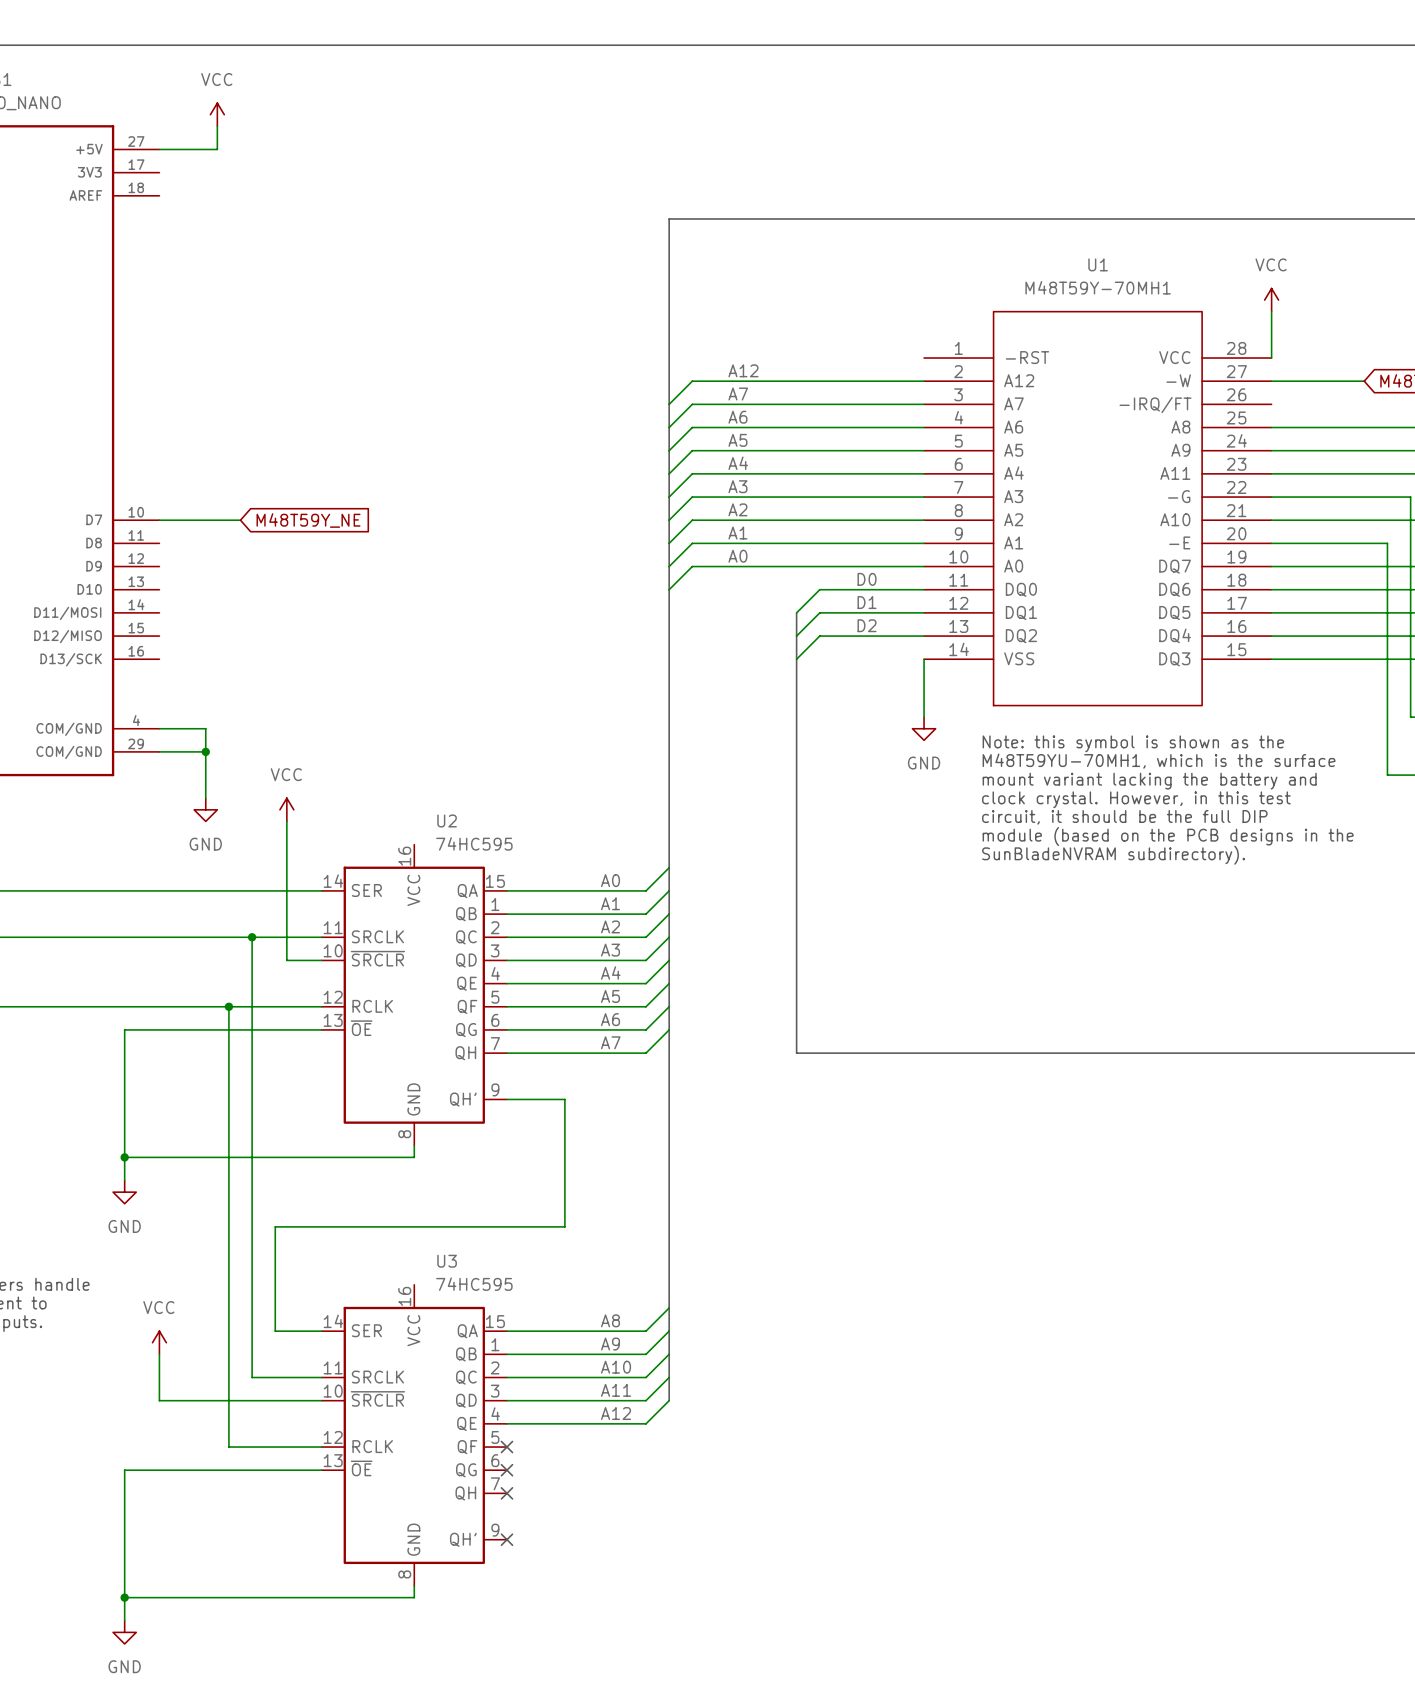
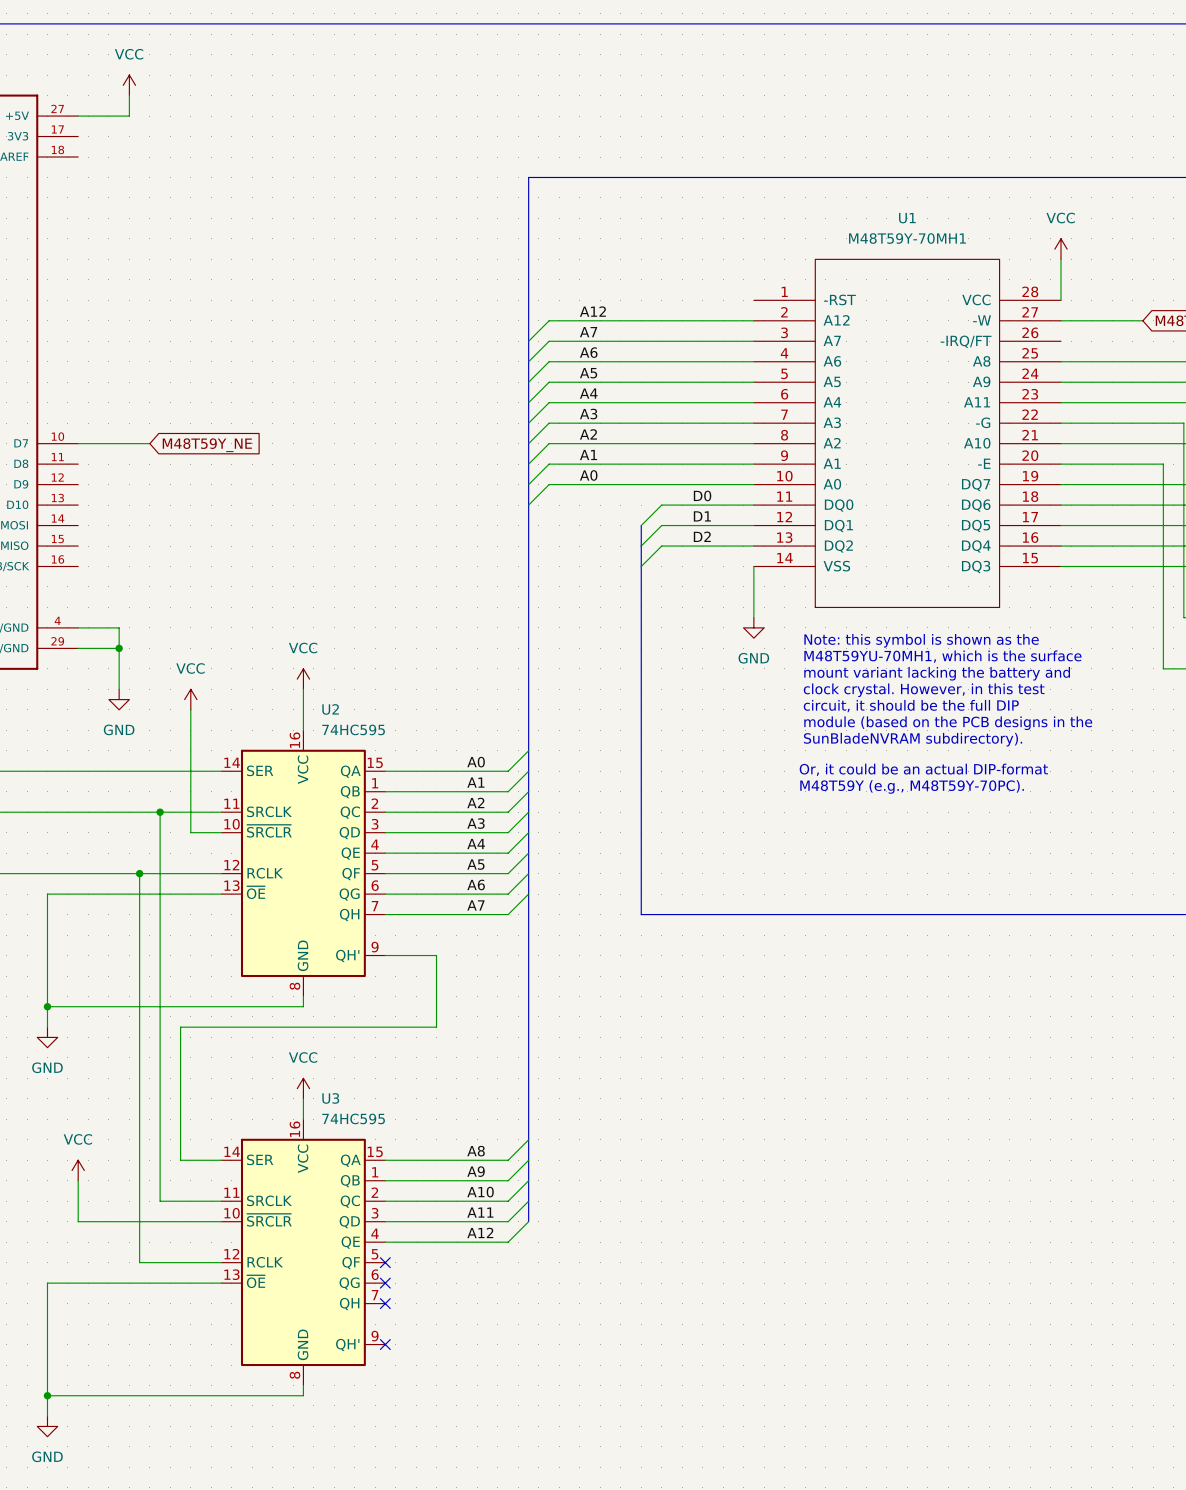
power symbol: none -> VCC (303, 679)
wire: none -> (303, 689) (303, 730)
text: none -> Or, it could be an actual DIP-format (923, 769)
text: none -> M48T59Y (e.g., M48T59Y-70PC). (912, 786)
wire: (564, 1180) (564, 1226) (275, 1226) -> (436, 1027) (180, 1027) (180, 1068)
power symbol: none -> VCC (303, 1088)
wire: none -> (303, 1098) (303, 1119)

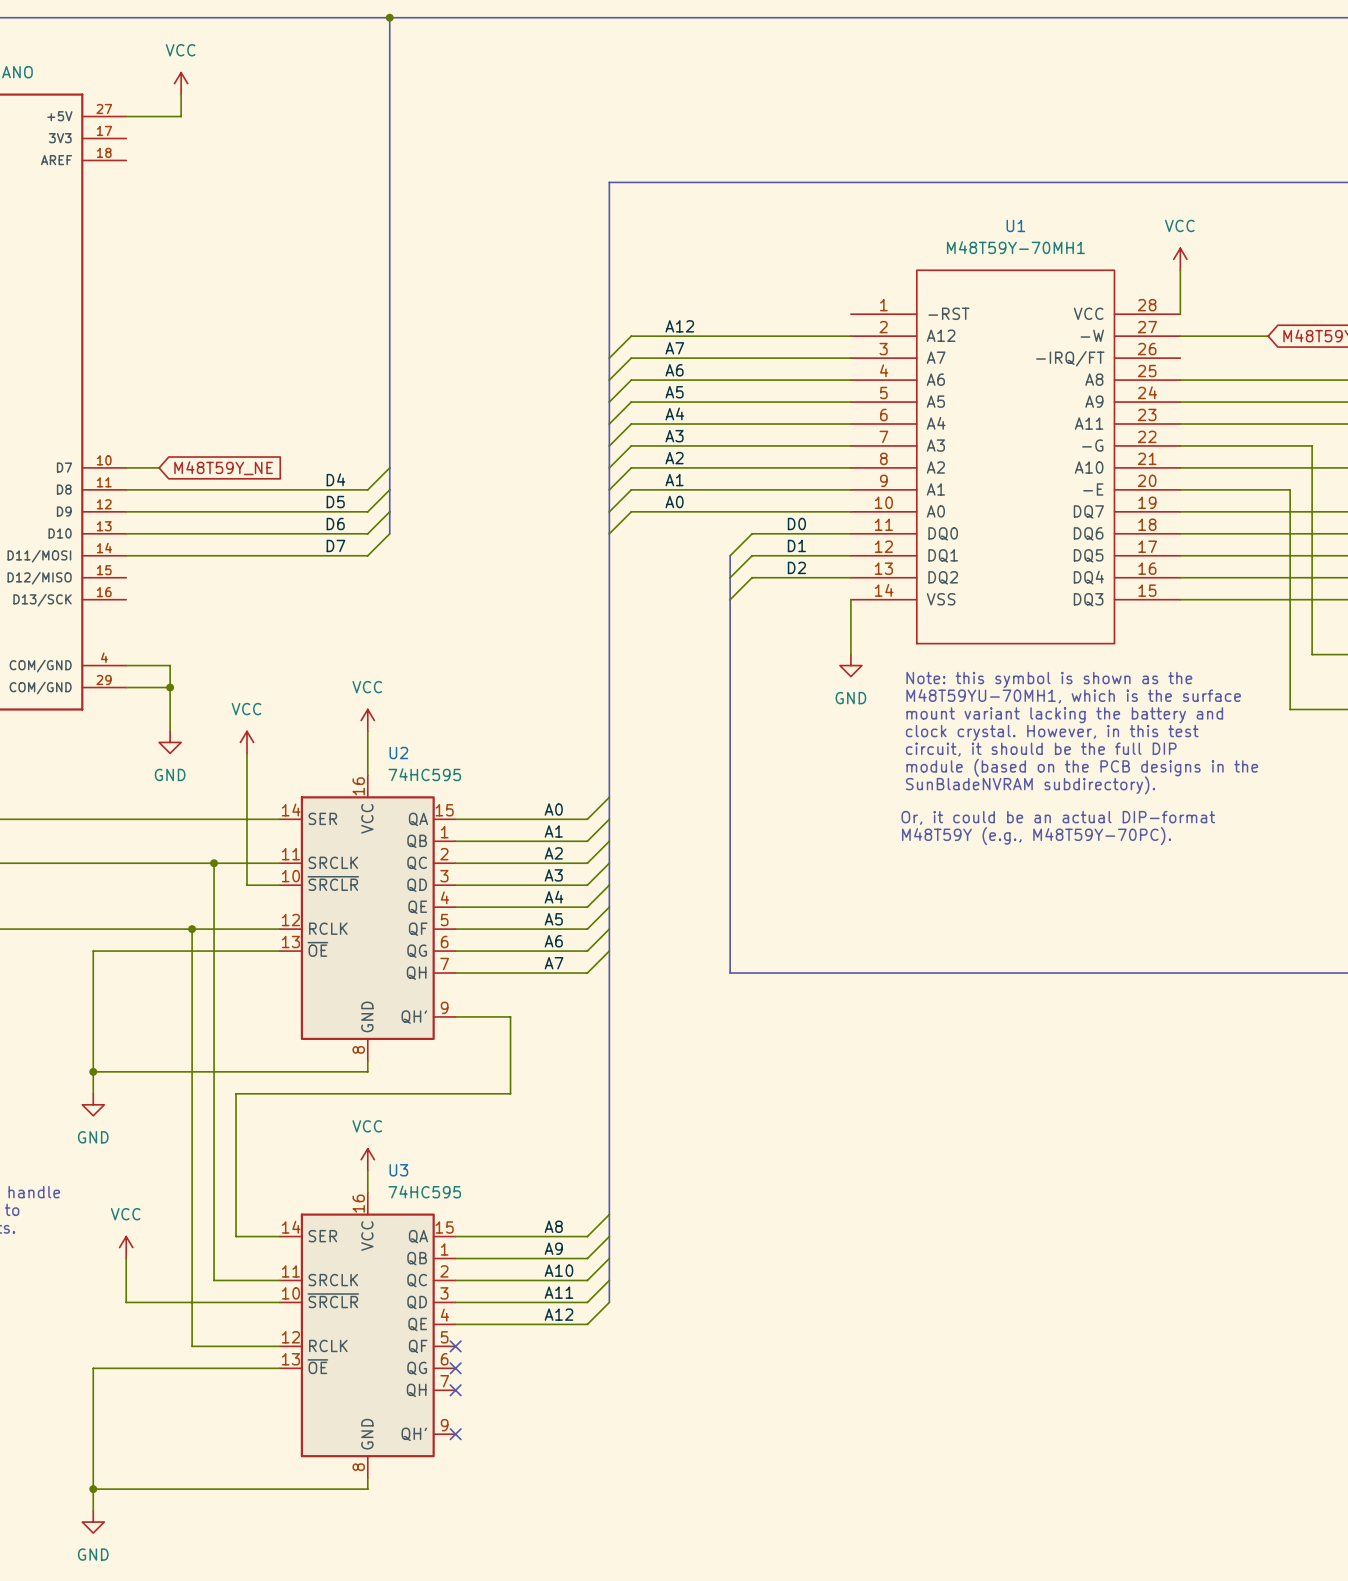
bus: none -> (389, 17) (389, 533)
junction: none -> (389, 17)
wire: (108, 443) (149, 443) -> none
wire: none -> (389, 467) (367, 489) (126, 489)
global label position: M48T59Y_NE (207, 445) -> M48T59Y_NE (223, 468)
label: none -> D4 (335, 479)
wire: none -> (389, 489) (367, 511) (126, 511)
label: none -> D5 (335, 502)
wire: none -> (389, 511) (367, 533) (126, 533)
label: none -> D6 (335, 524)
wire: none -> (389, 533) (367, 555) (126, 555)
label: none -> D7 (335, 545)

